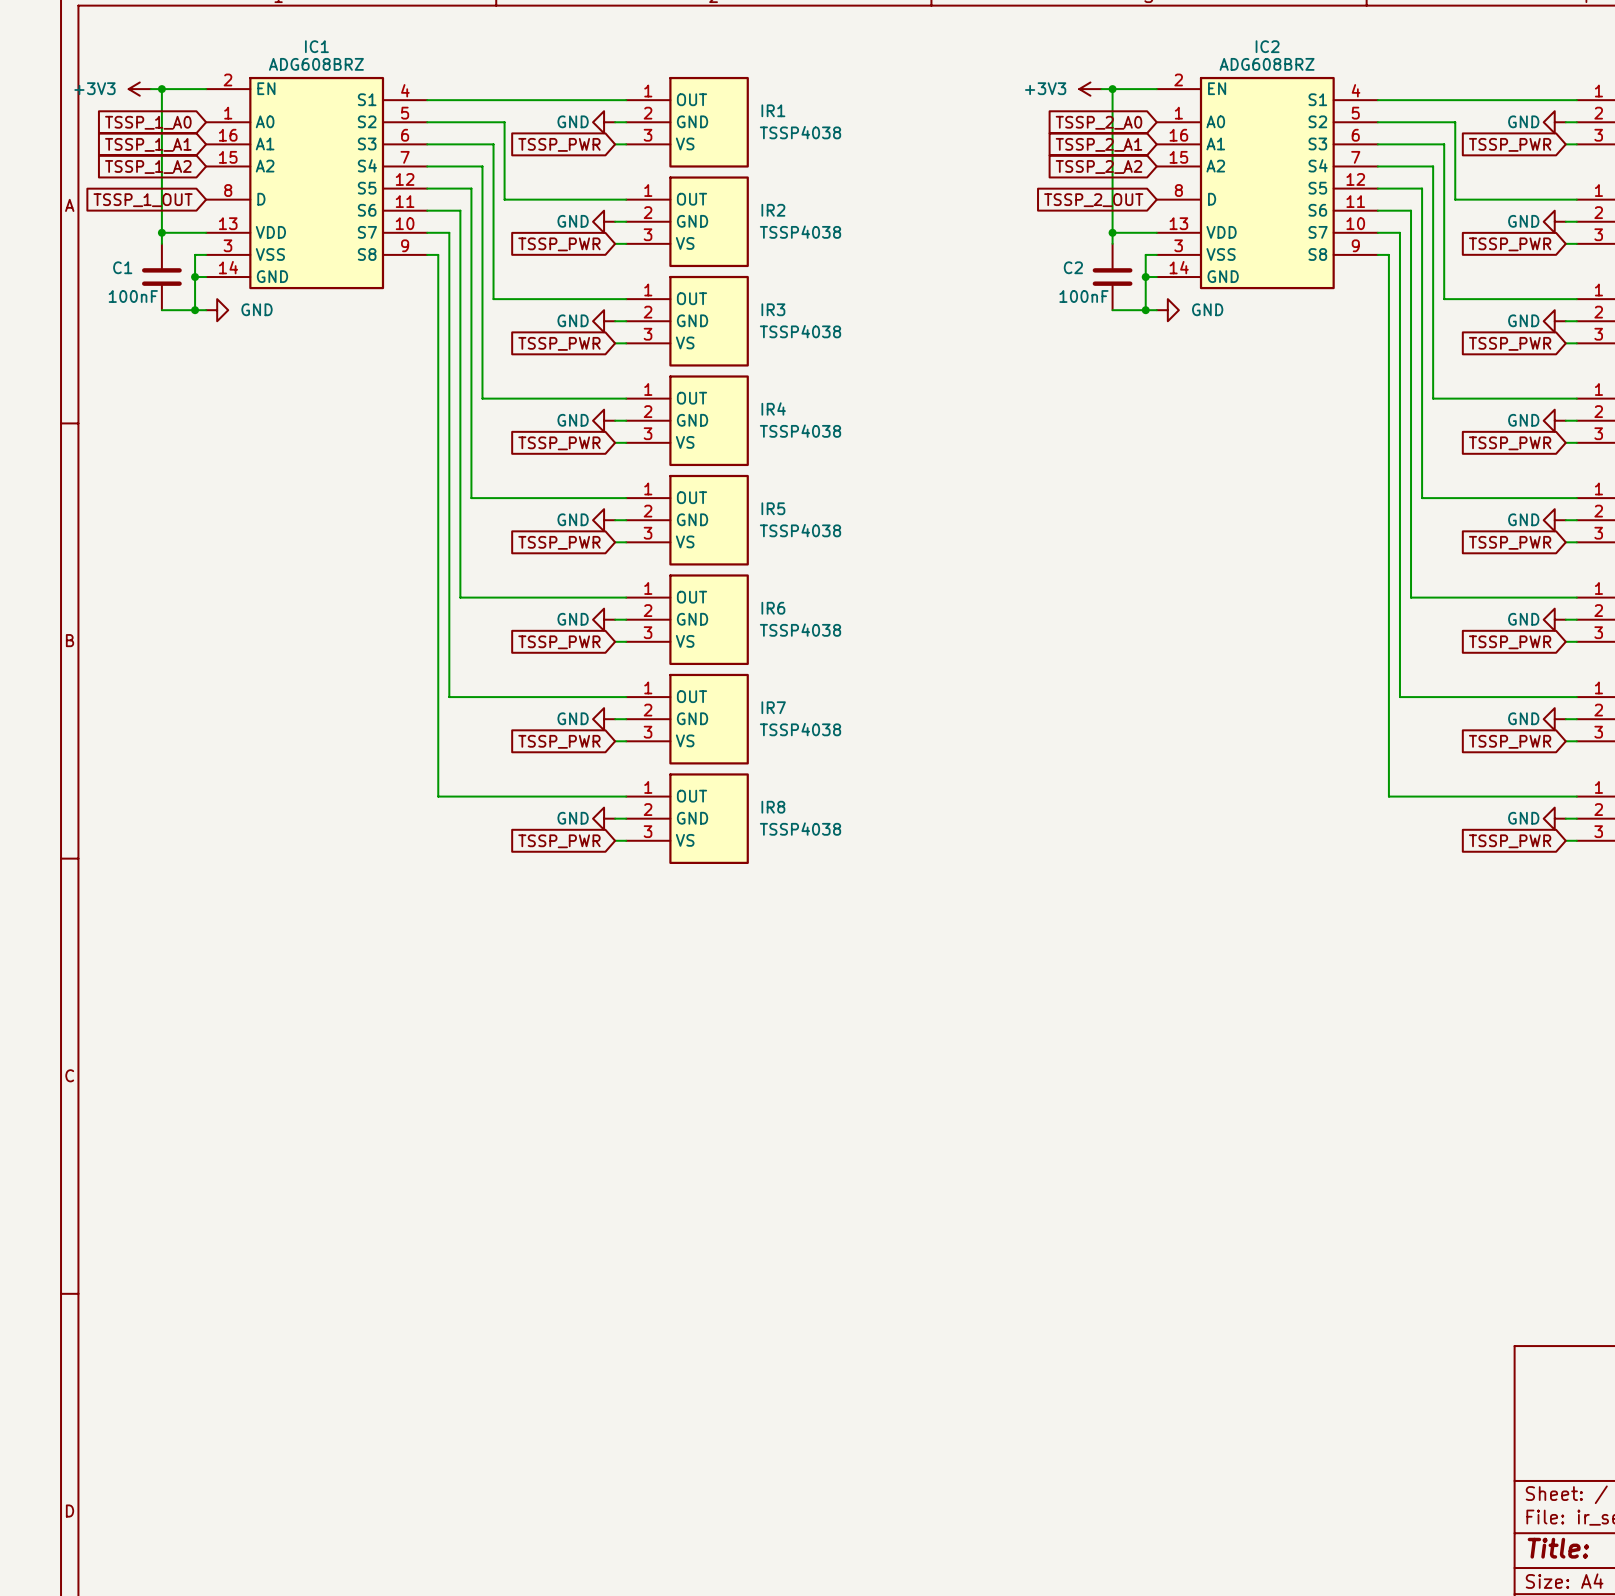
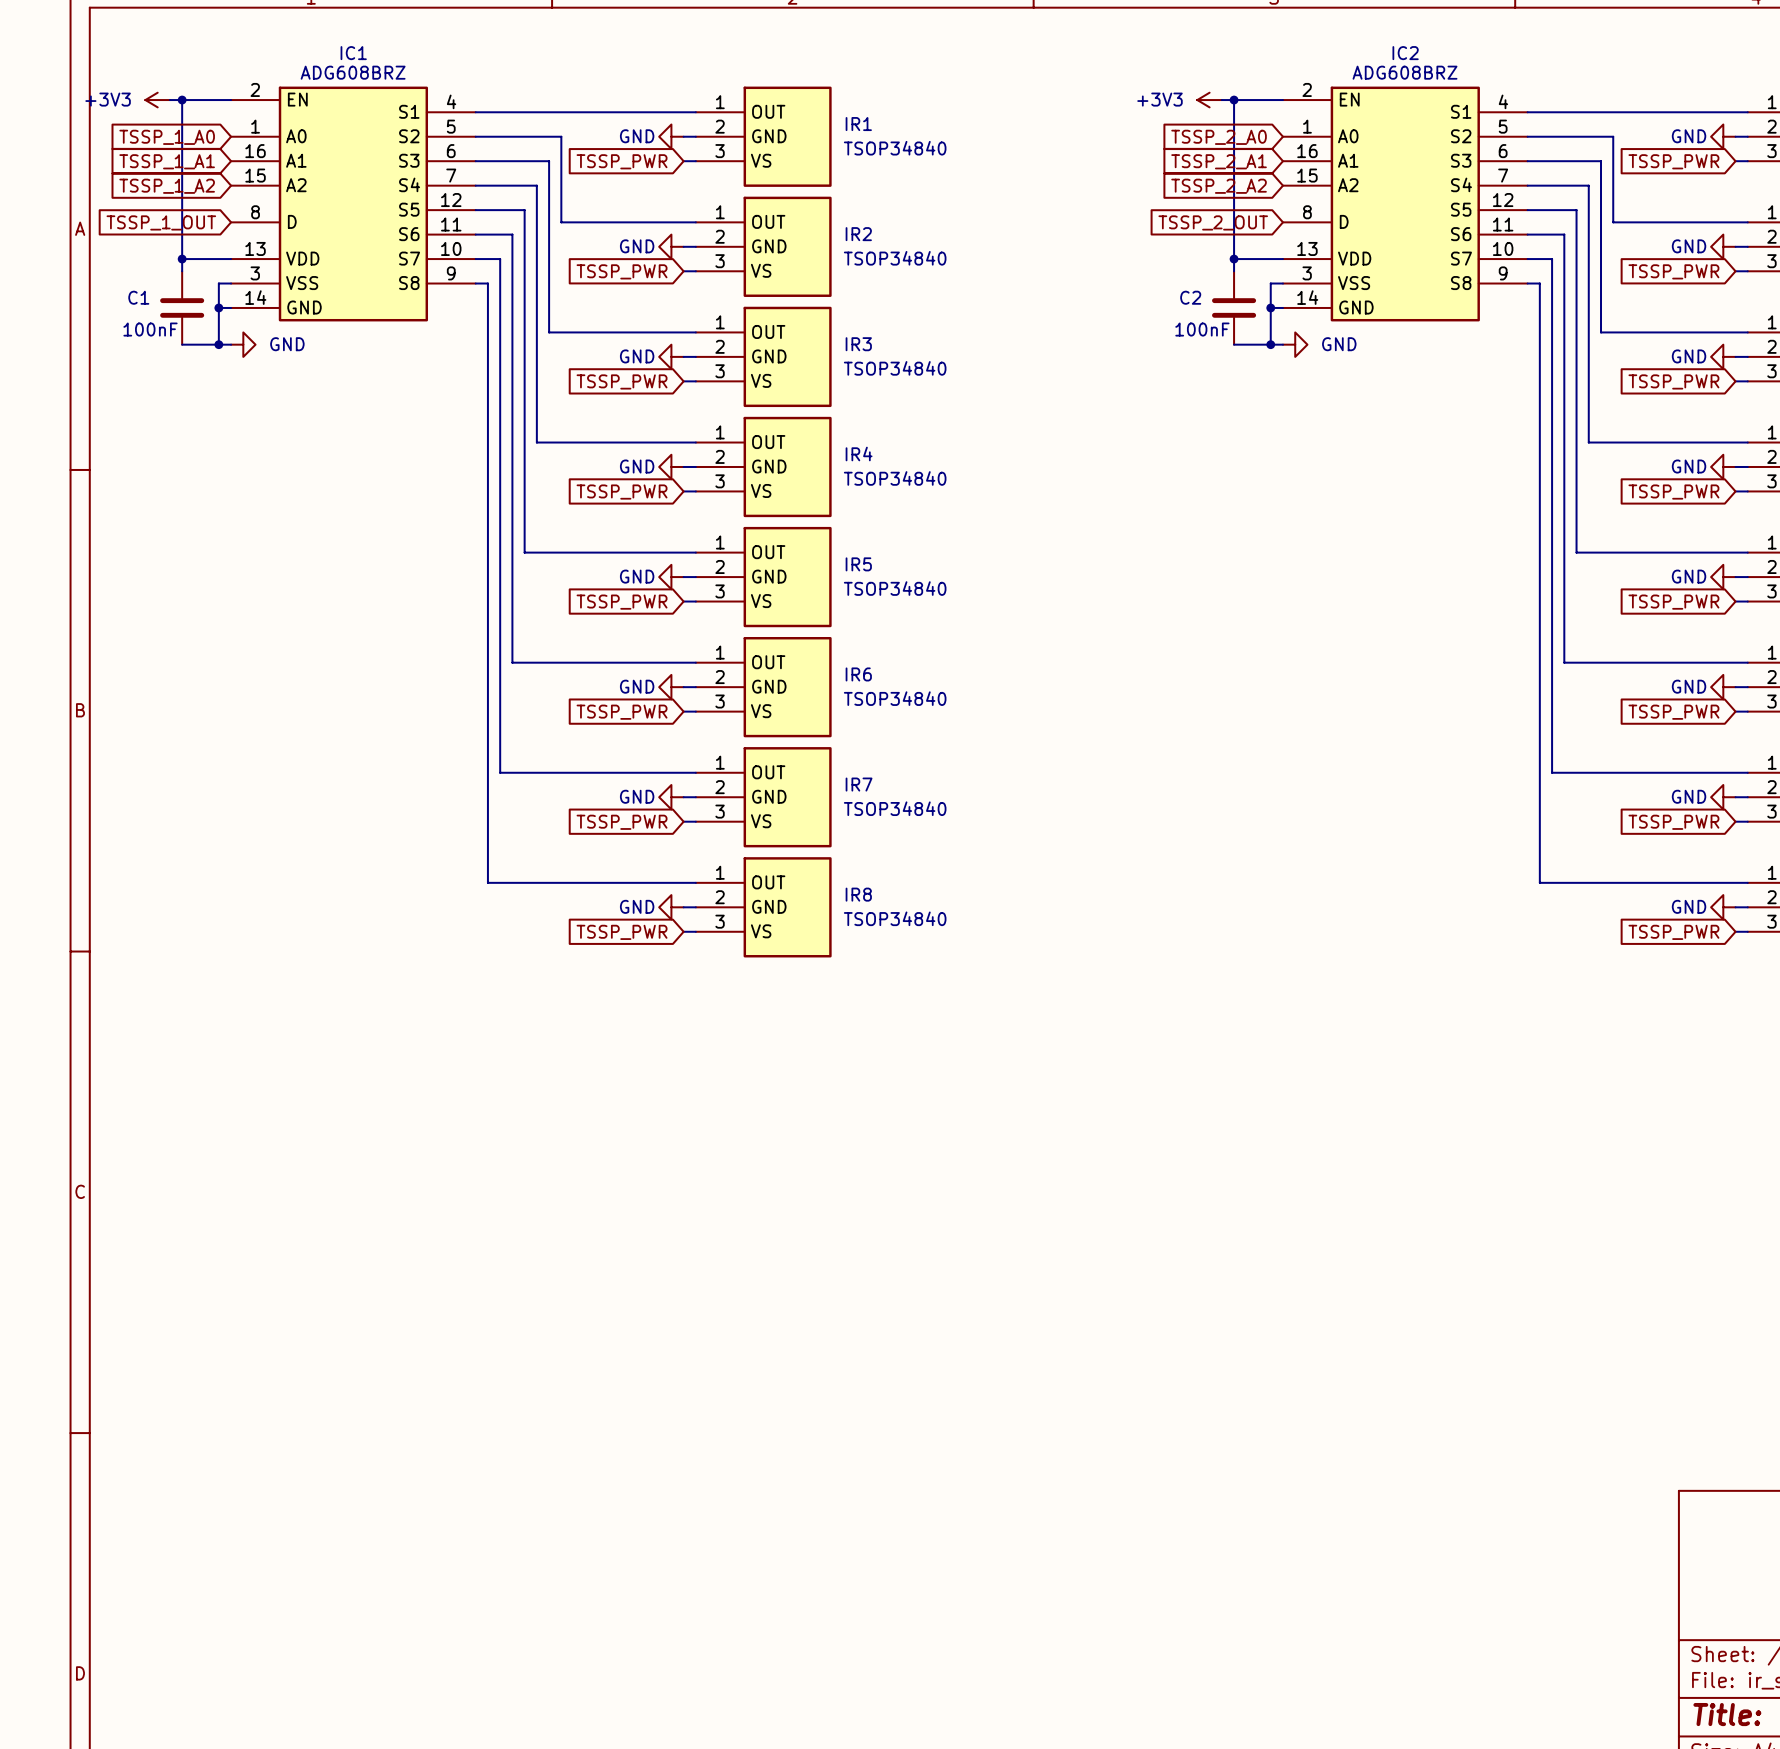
IR1 value: TSSP4038 (800, 132) -> TSOP34840 (895, 148)
IR2 value: TSSP4038 (800, 232) -> TSOP34840 (895, 258)
IR3 value: TSSP4038 (800, 331) -> TSOP34840 (895, 368)
IR4 value: TSSP4038 (800, 431) -> TSOP34840 (895, 478)
IR5 value: TSSP4038 (800, 530) -> TSOP34840 (895, 588)
IR6 value: TSSP4038 (800, 630) -> TSOP34840 (895, 698)
IR7 value: TSSP4038 (800, 729) -> TSOP34840 (895, 808)
IR8 value: TSSP4038 (800, 829) -> TSOP34840 (895, 918)

